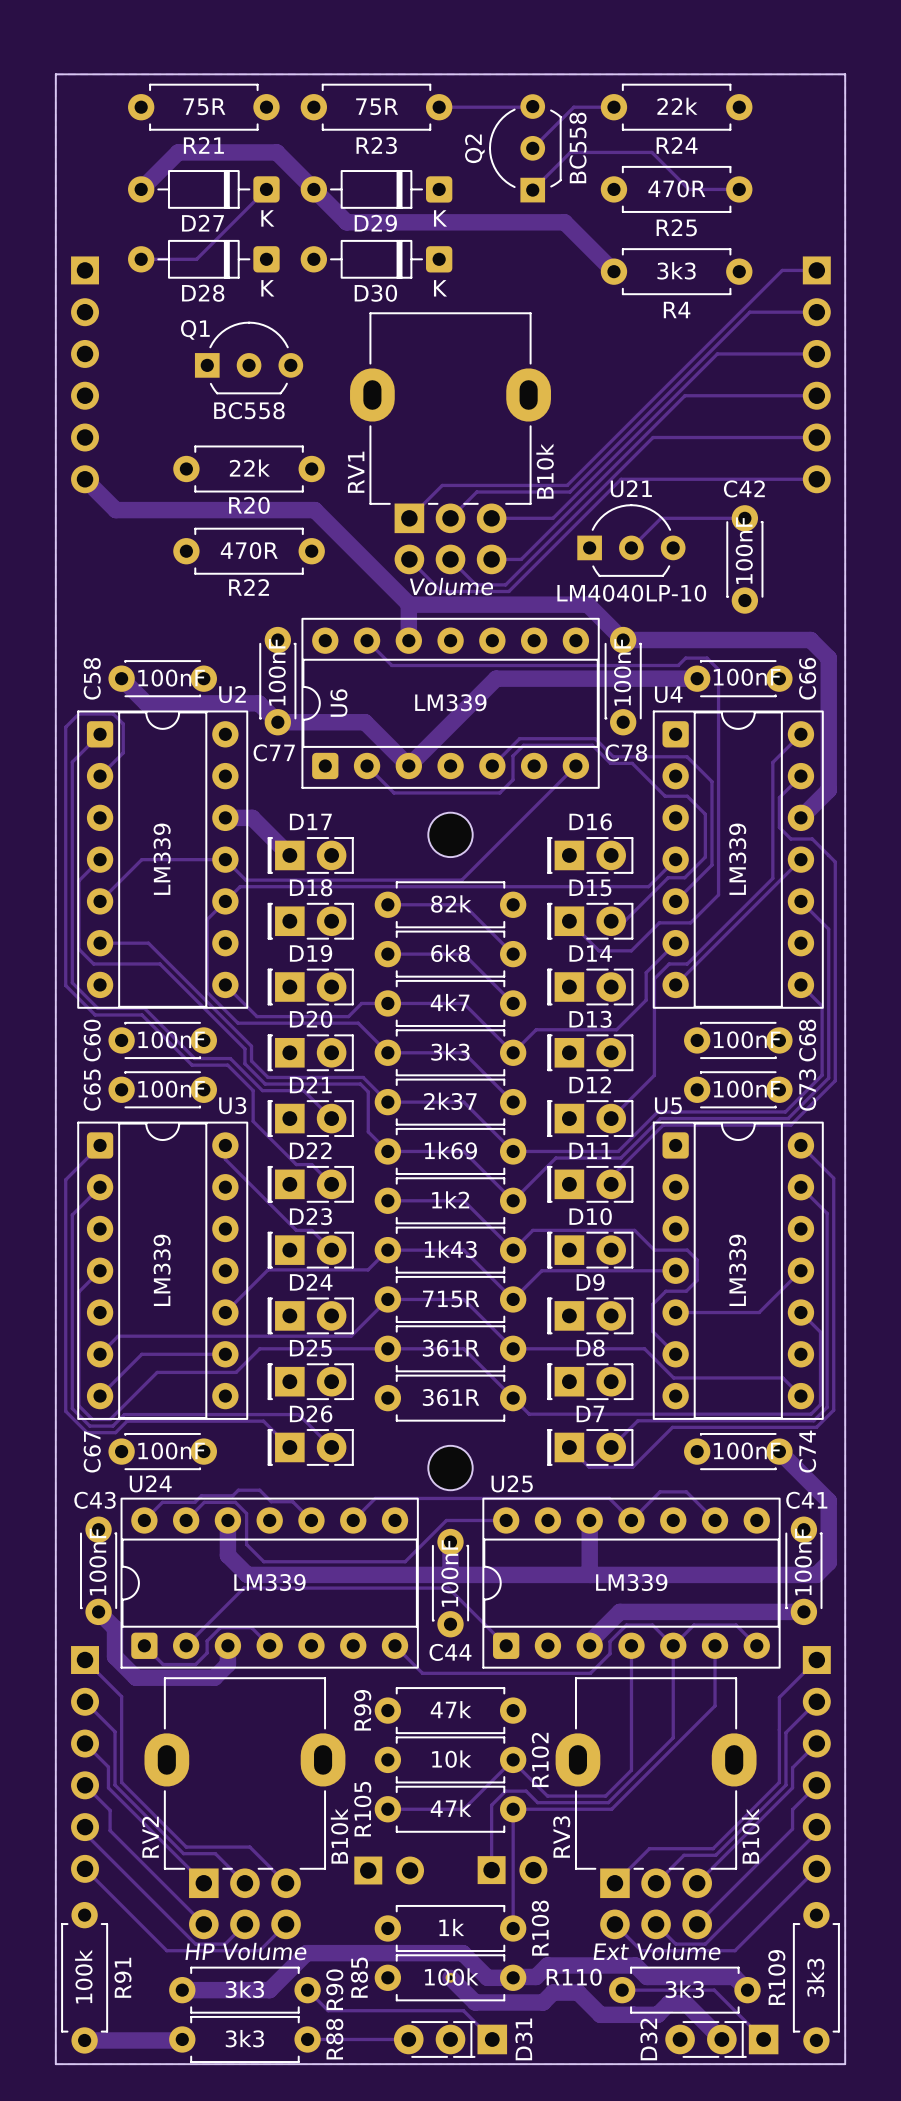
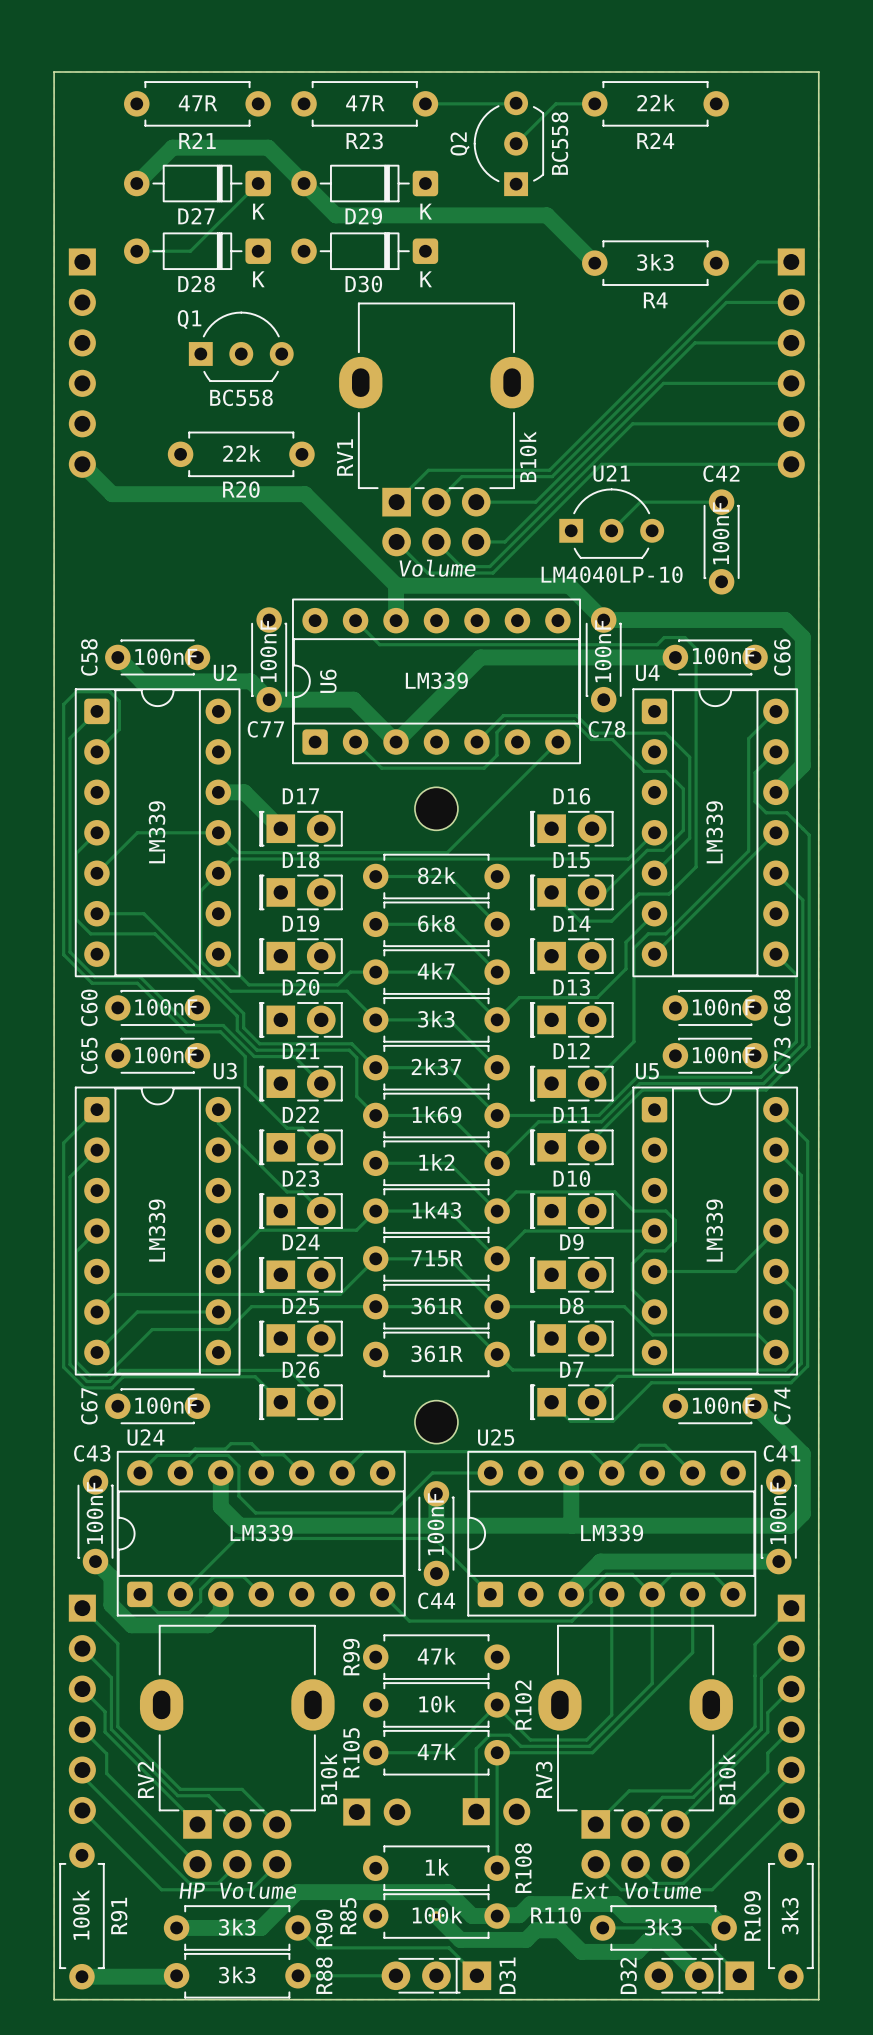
R21 value: 75R (204, 106) -> 47R (198, 103)
R23 value: 75R (377, 106) -> 47R (365, 103)
R25: 470R (676, 189) -> none
track: (739, 189) (688, 189) (651, 152) (570, 152) (532, 190) -> none
R22: 470R (249, 551) -> none

